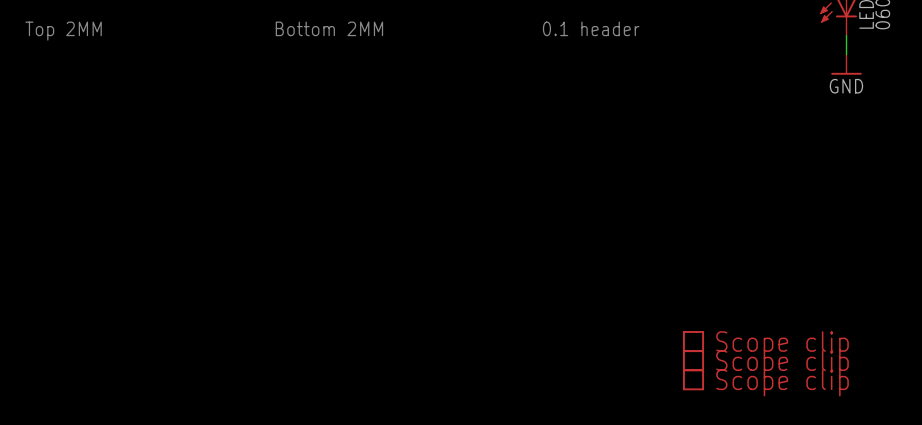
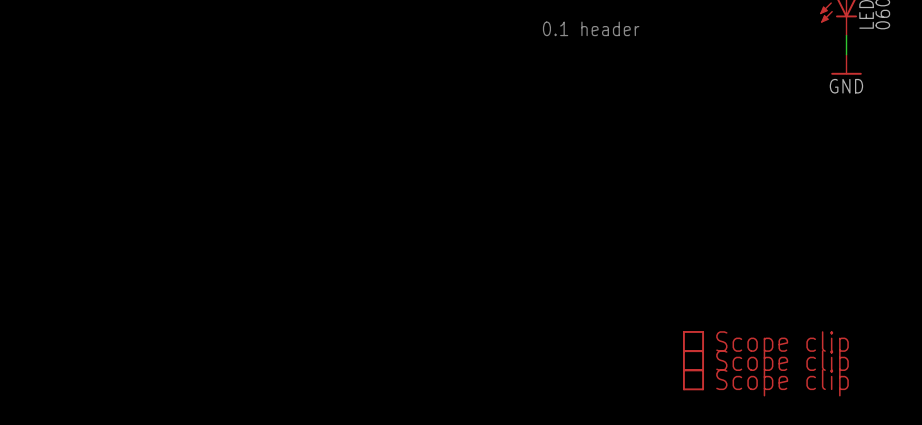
text: Bottom 2MM (329, 28) -> none
text: Top 2MM (63, 31) -> none

